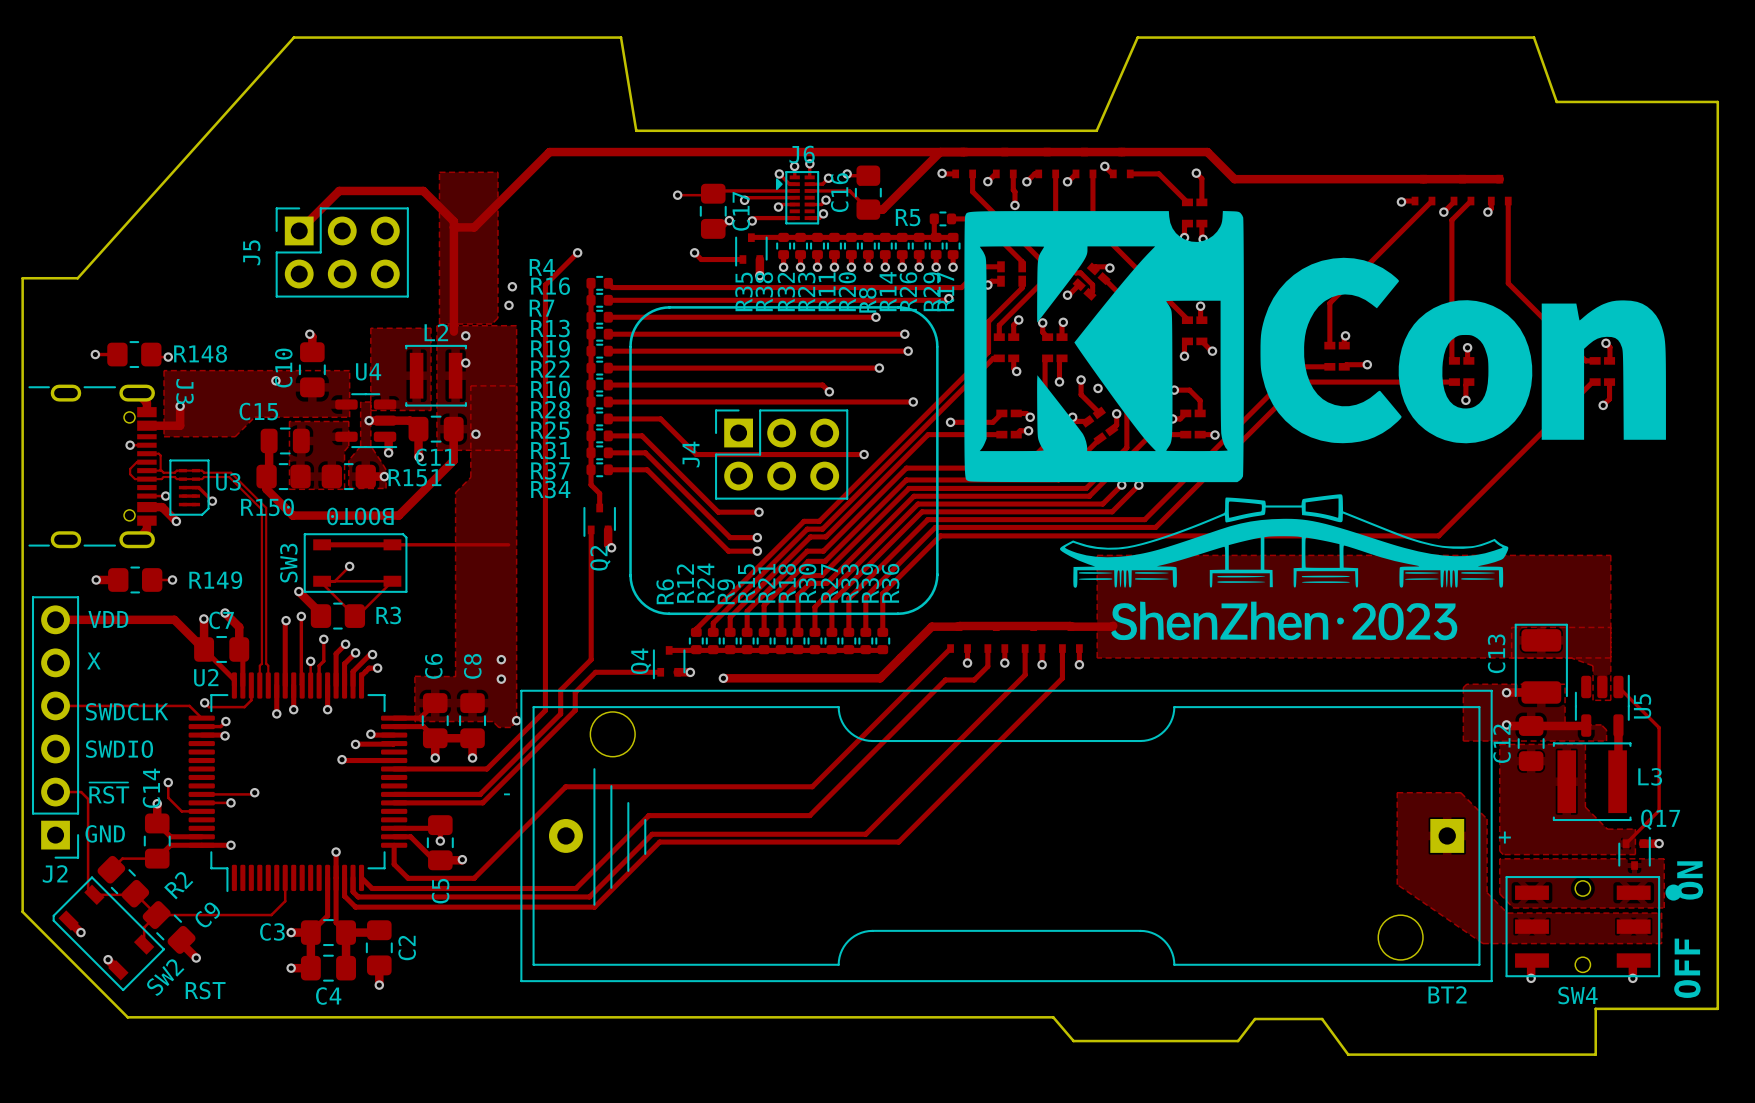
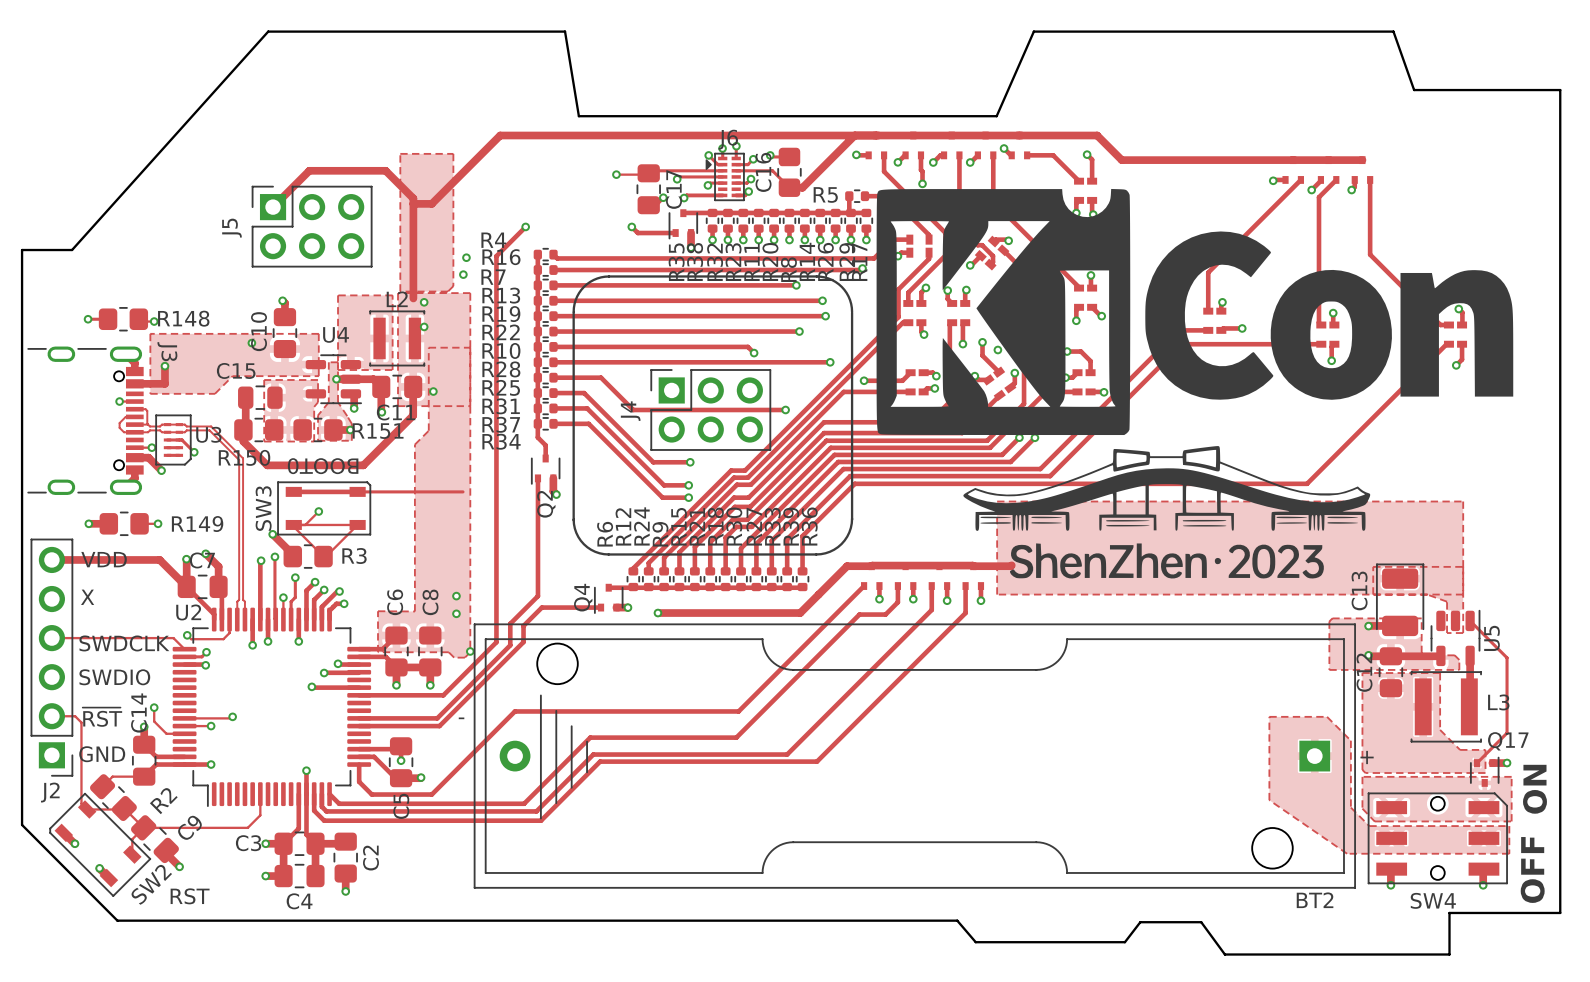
SW4 footprint: [1505, 876, 1682, 978] -> [1367, 792, 1508, 885]

